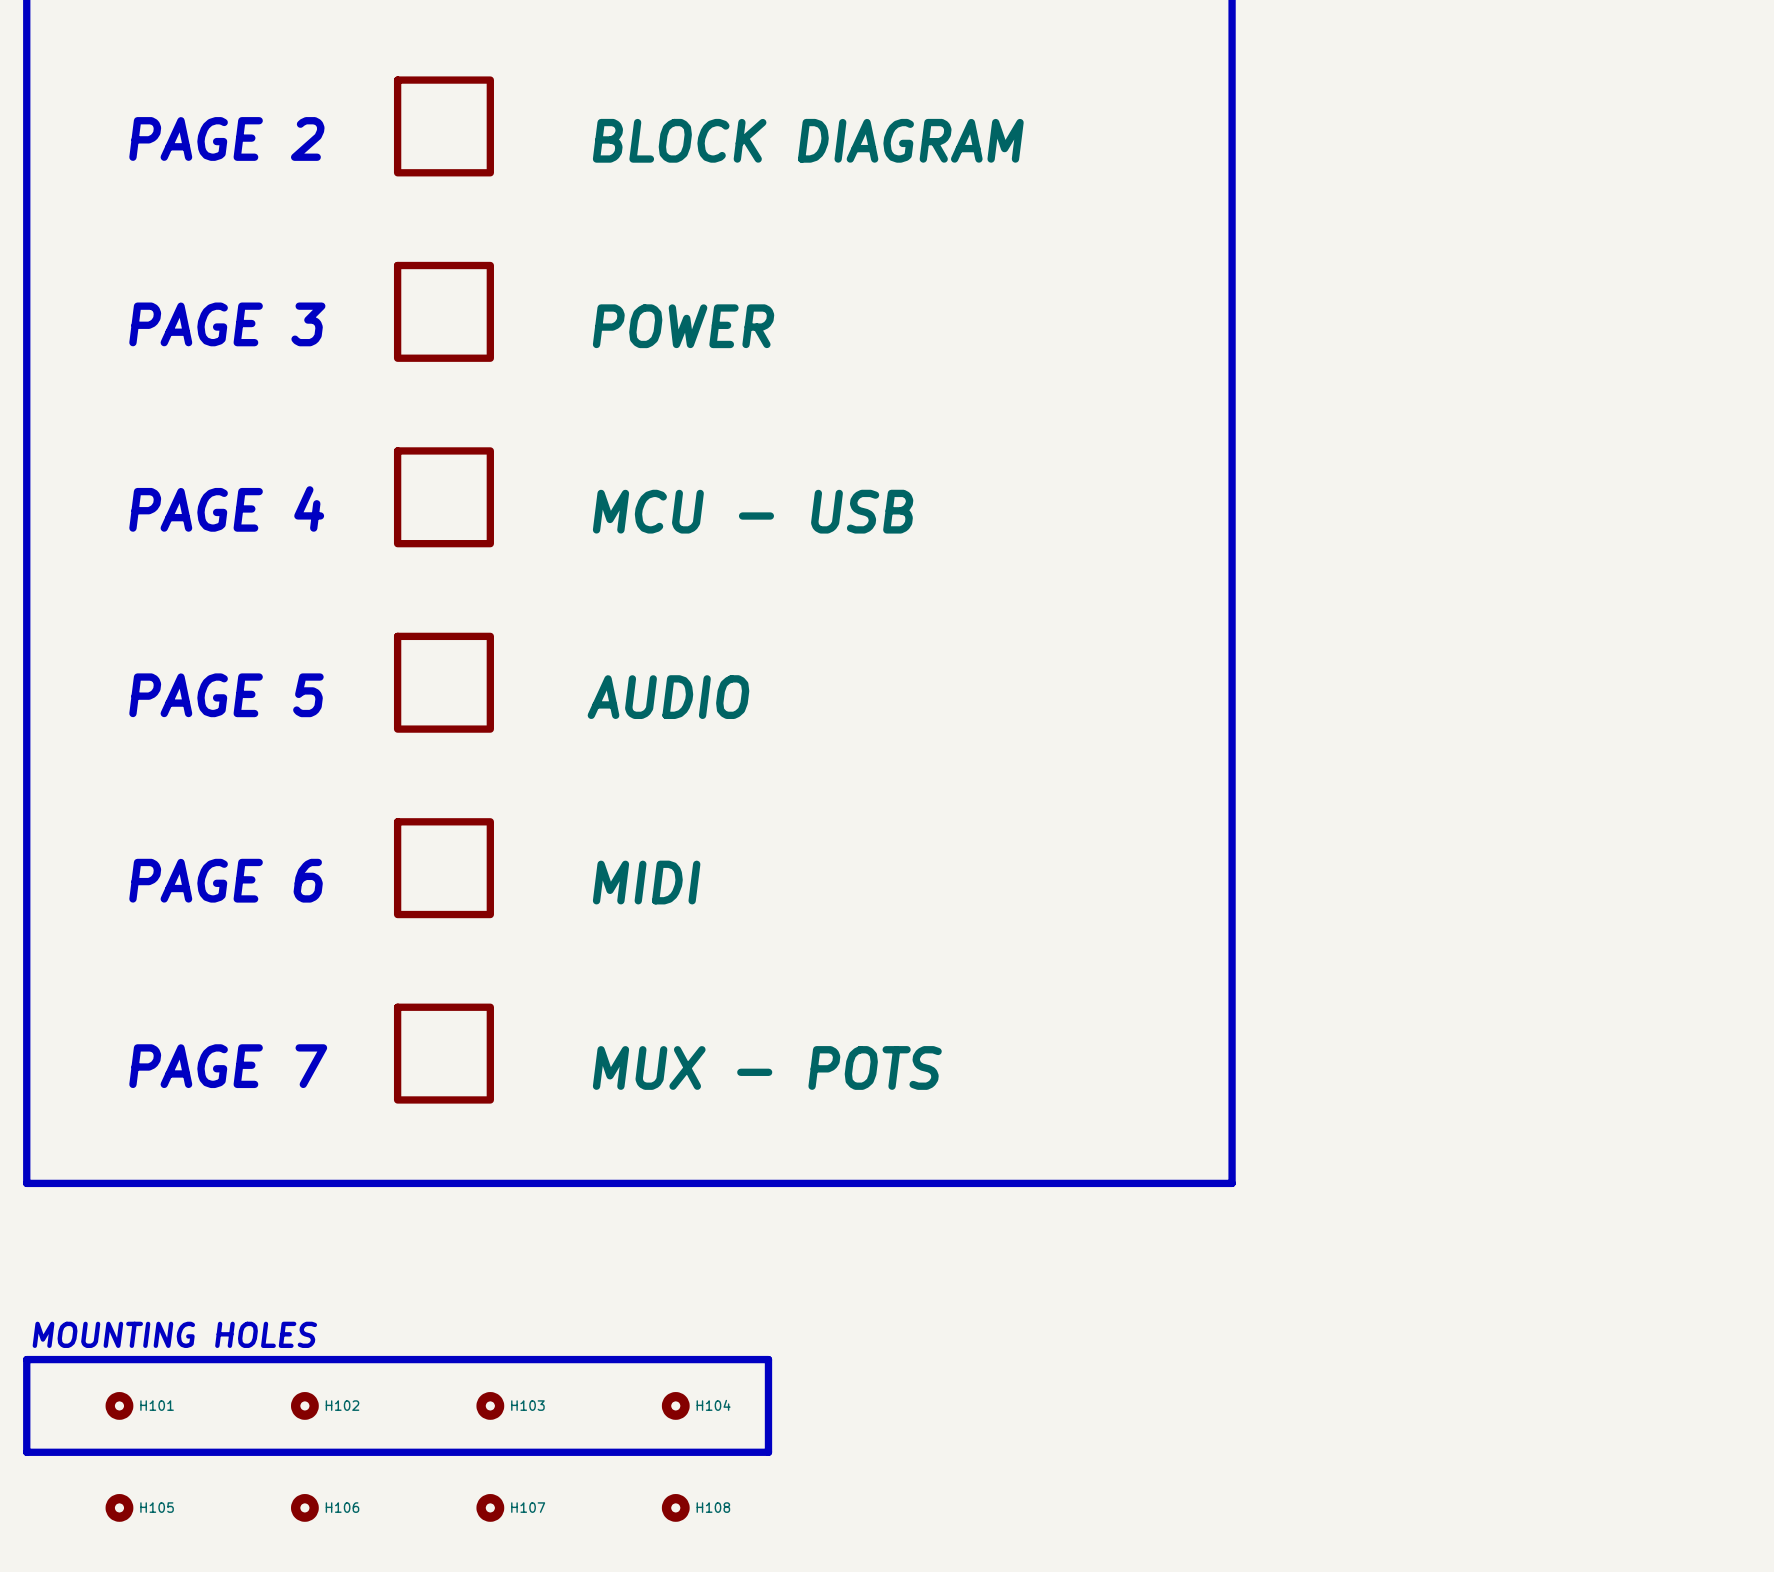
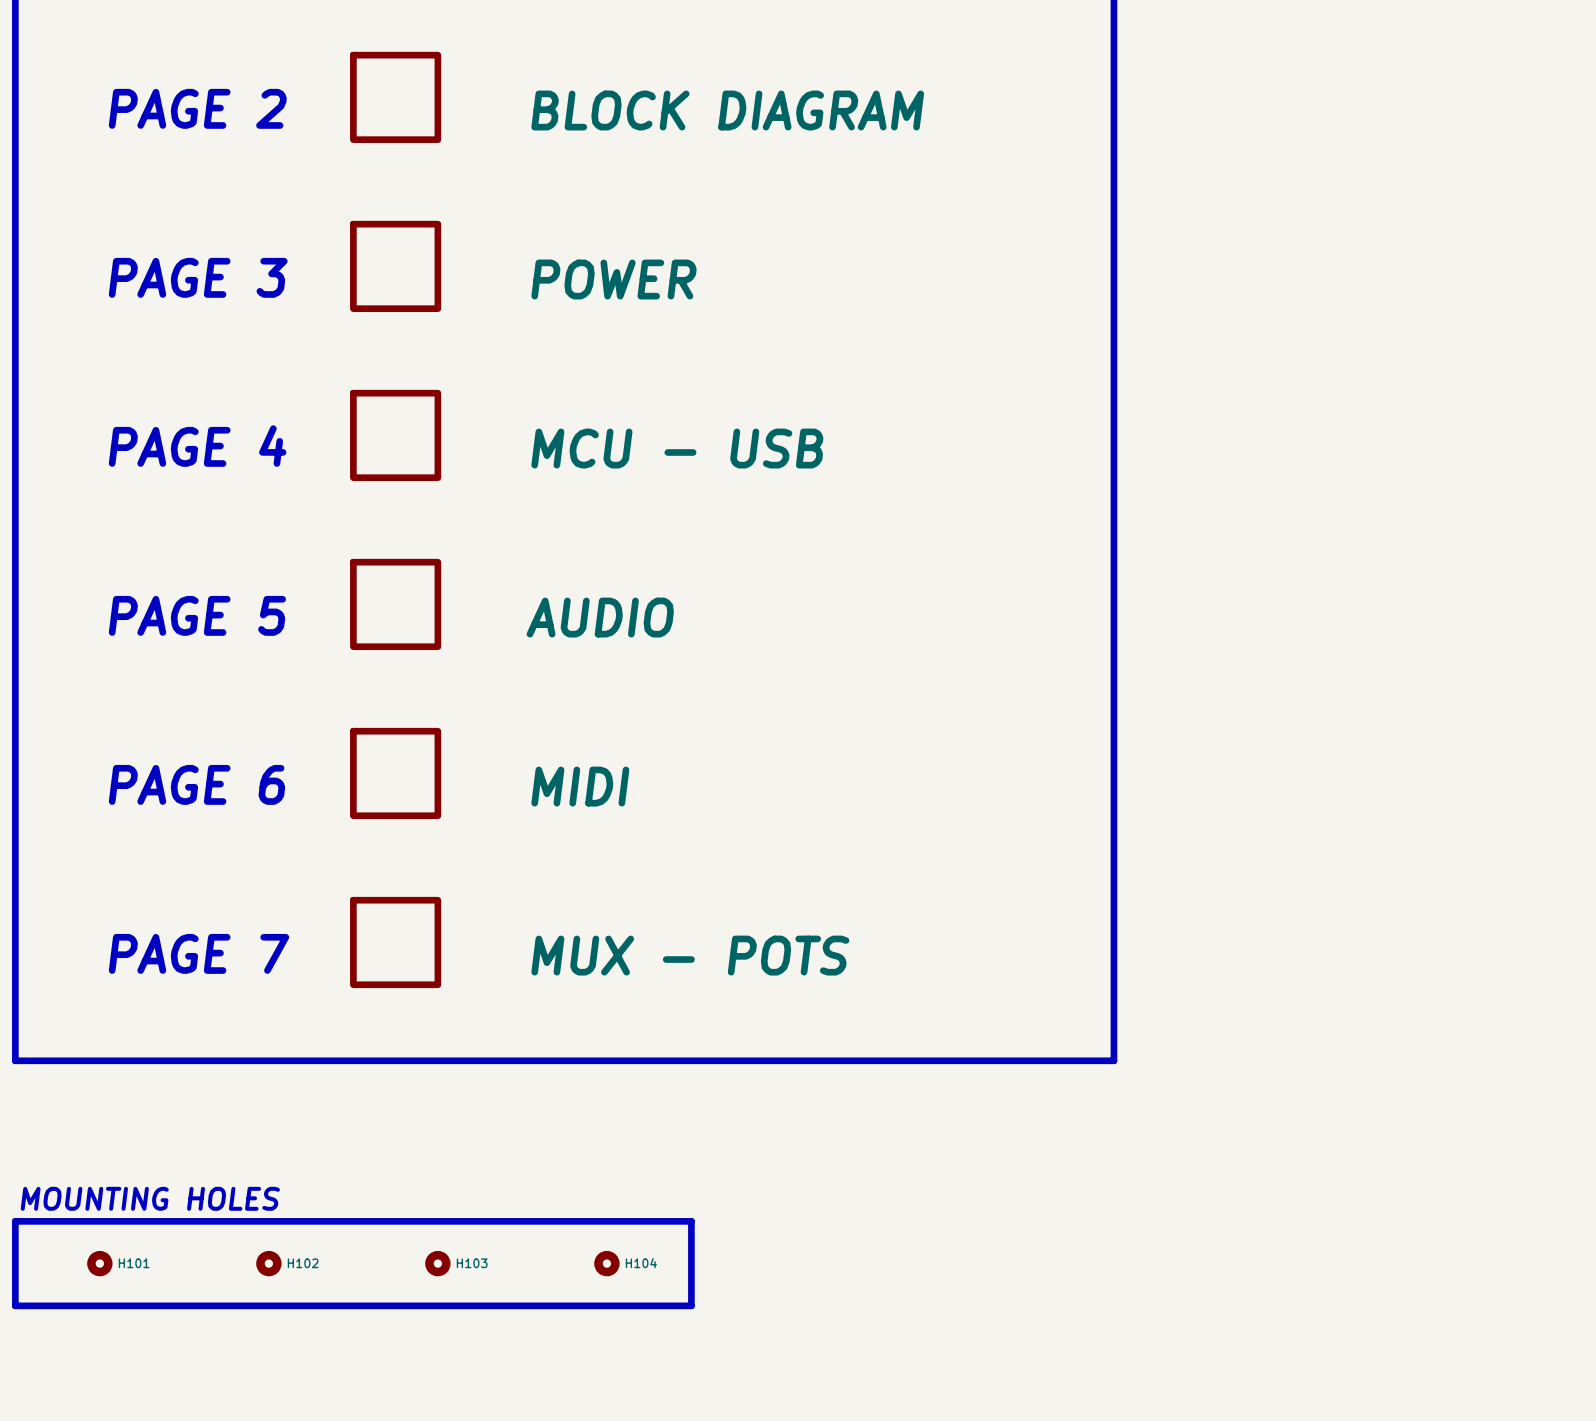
H105: (119, 1507) -> none
H106: (304, 1507) -> none
H107: (490, 1507) -> none
H108: (675, 1507) -> none

